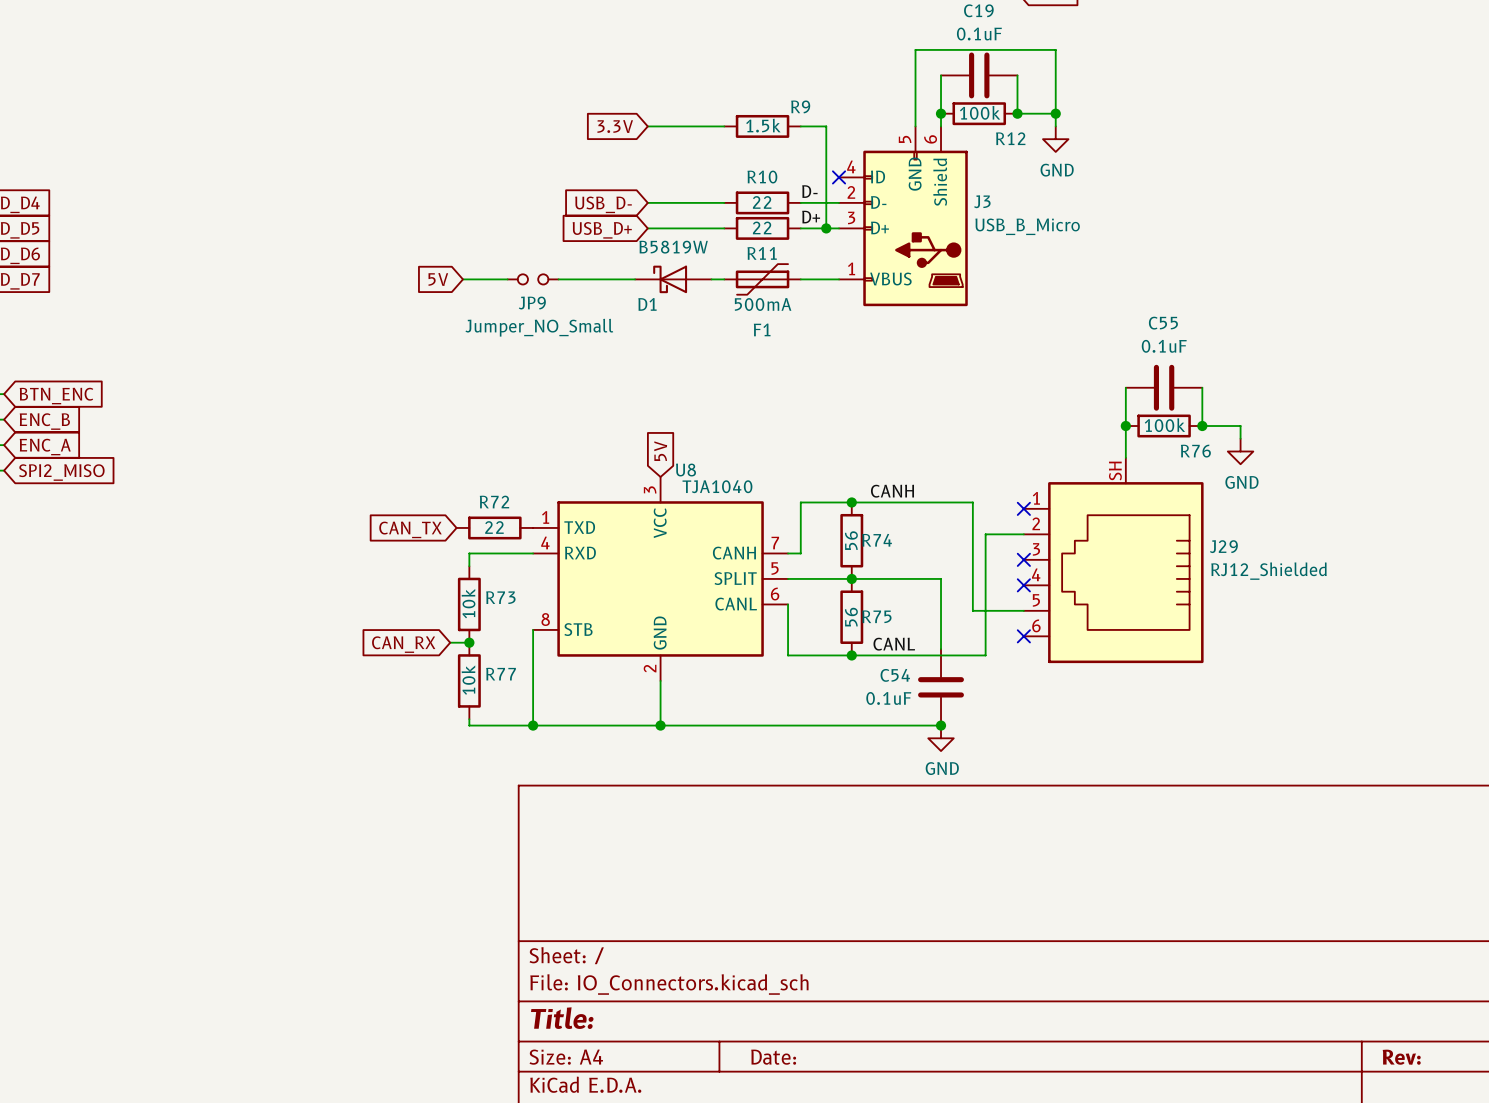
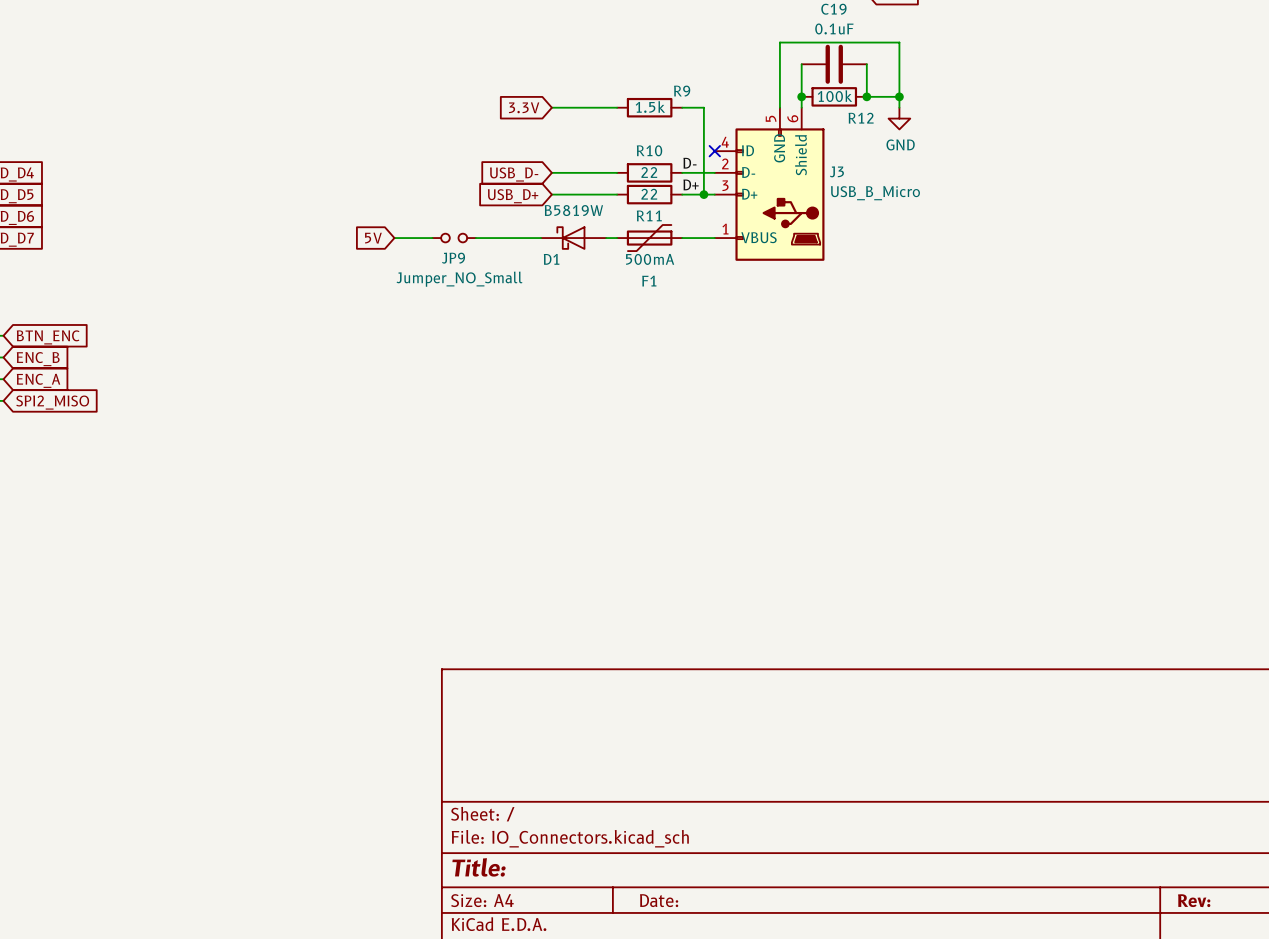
wire: (1125, 387) (1125, 457) -> none
C55: 0.1uF (1164, 387) -> none
wire: (1202, 387) (1202, 426) (1240, 426) (1240, 438) -> none
junction: (1125, 426) -> none
R76: 100k (1164, 426) -> none
junction: (1202, 426) -> none
global label: 5V (660, 451) -> none
power symbol: GND (1240, 451) -> none
label: CANH (892, 491) -> none
junction: (851, 502) -> none
no-connect mark: (1023, 508) -> none
R72: 22 (494, 527) -> none
global label: CAN_TX (410, 529) -> none
wire: (1023, 534) (985, 534) (985, 655) (788, 655) (788, 604) -> none
R74: 56 (851, 540) -> none
wire: (533, 553) (469, 553) (469, 566) -> none
wire: (788, 553) (800, 553) (800, 502) (972, 502) (972, 610) (1023, 610) -> none
no-connect mark: (1023, 559) -> none
J29: RJ12_Shielded (1113, 560) -> none
U8: TJA1040 (660, 578) -> none
wire: (788, 578) (941, 578) (941, 649) -> none
junction: (851, 578) -> none
no-connect mark: (1023, 585) -> none
R73: 10k (469, 604) -> none
R75: 56 (851, 617) -> none
wire: (533, 629) (533, 725) -> none
no-connect mark: (1023, 636) -> none
wire: (450, 642) (469, 642) -> none
junction: (469, 642) -> none
global label: CAN_RX (403, 644) -> none
label: CANL (894, 644) -> none
junction: (851, 655) -> none
R77: 10k (469, 680) -> none
wire: (660, 680) (660, 725) -> none
C54: 0.1uF (941, 687) -> none
wire: (469, 719) (469, 725) (941, 725) -> none
junction: (533, 725) -> none
junction: (660, 725) -> none
junction: (941, 725) -> none
power symbol: GND (941, 738) -> none

